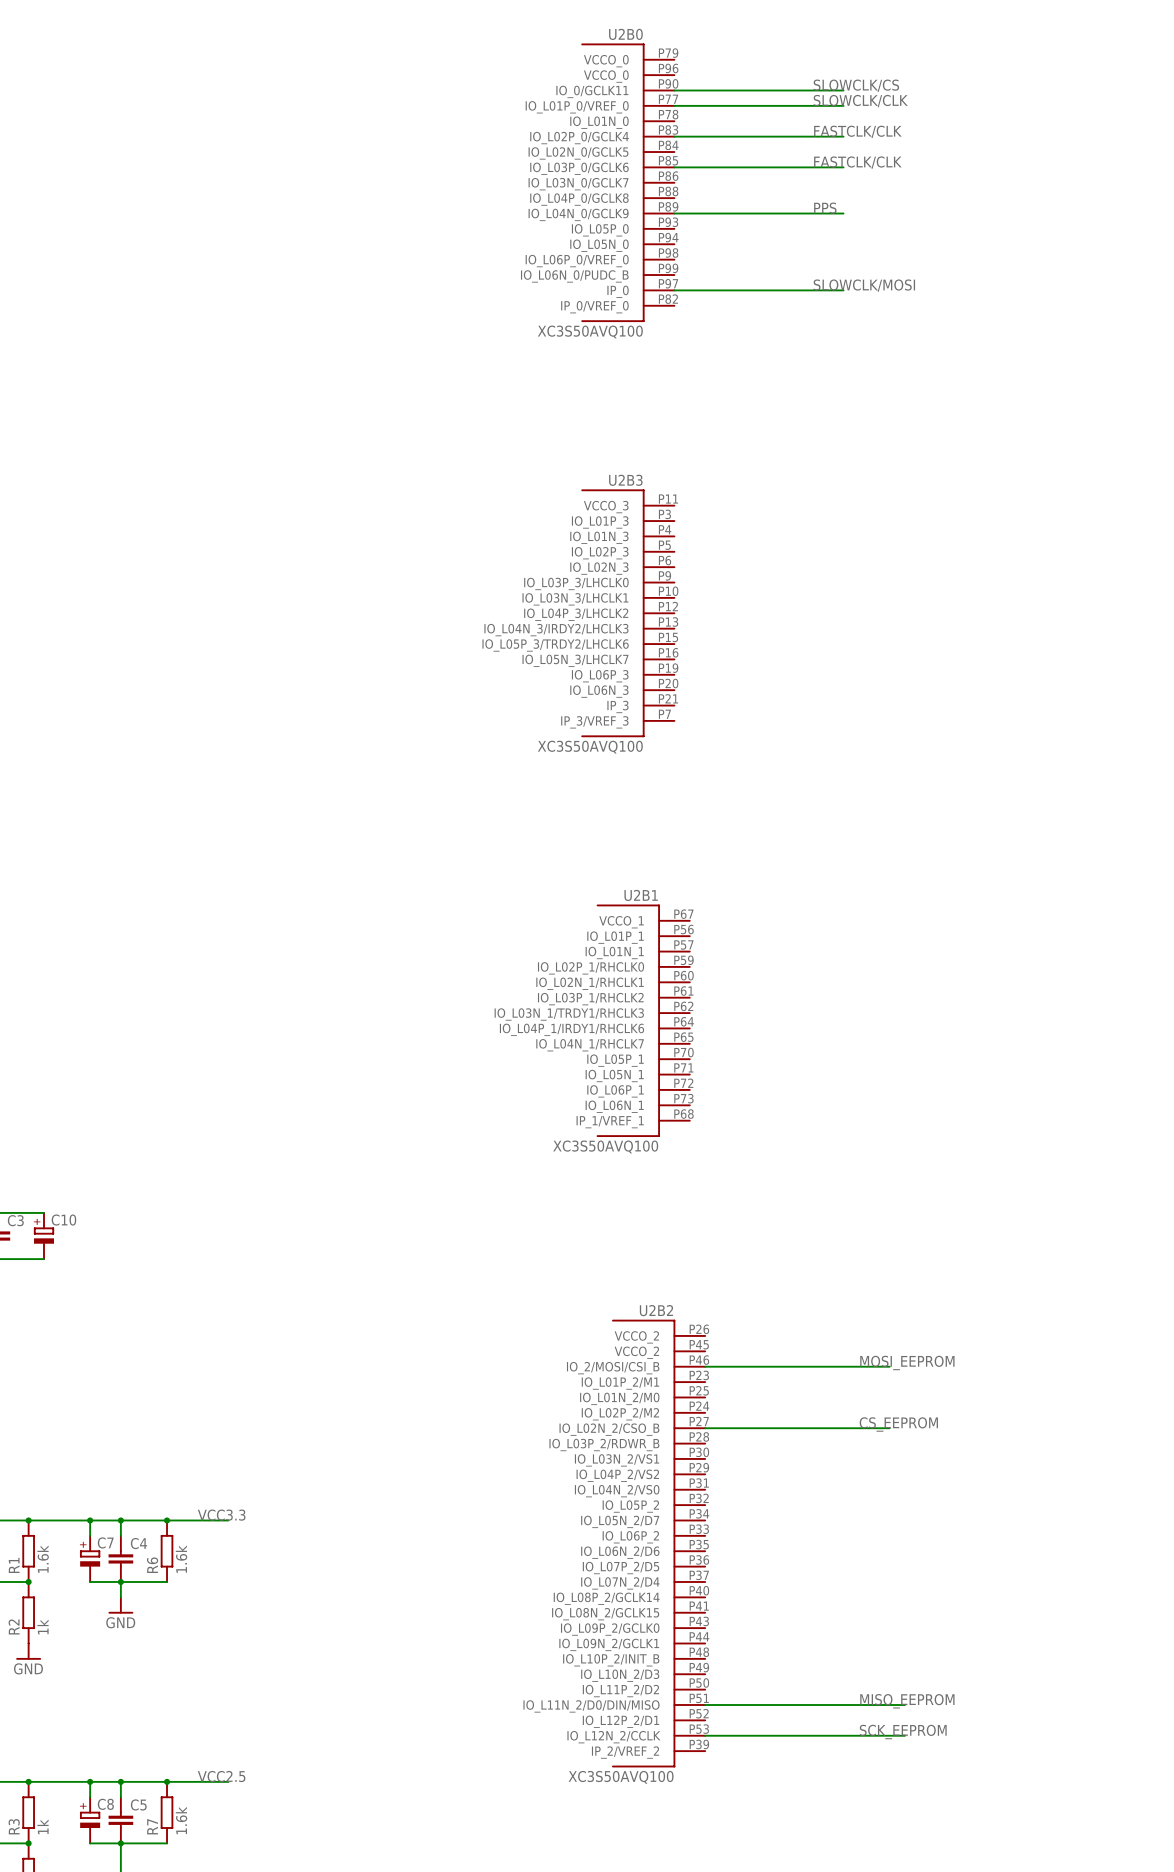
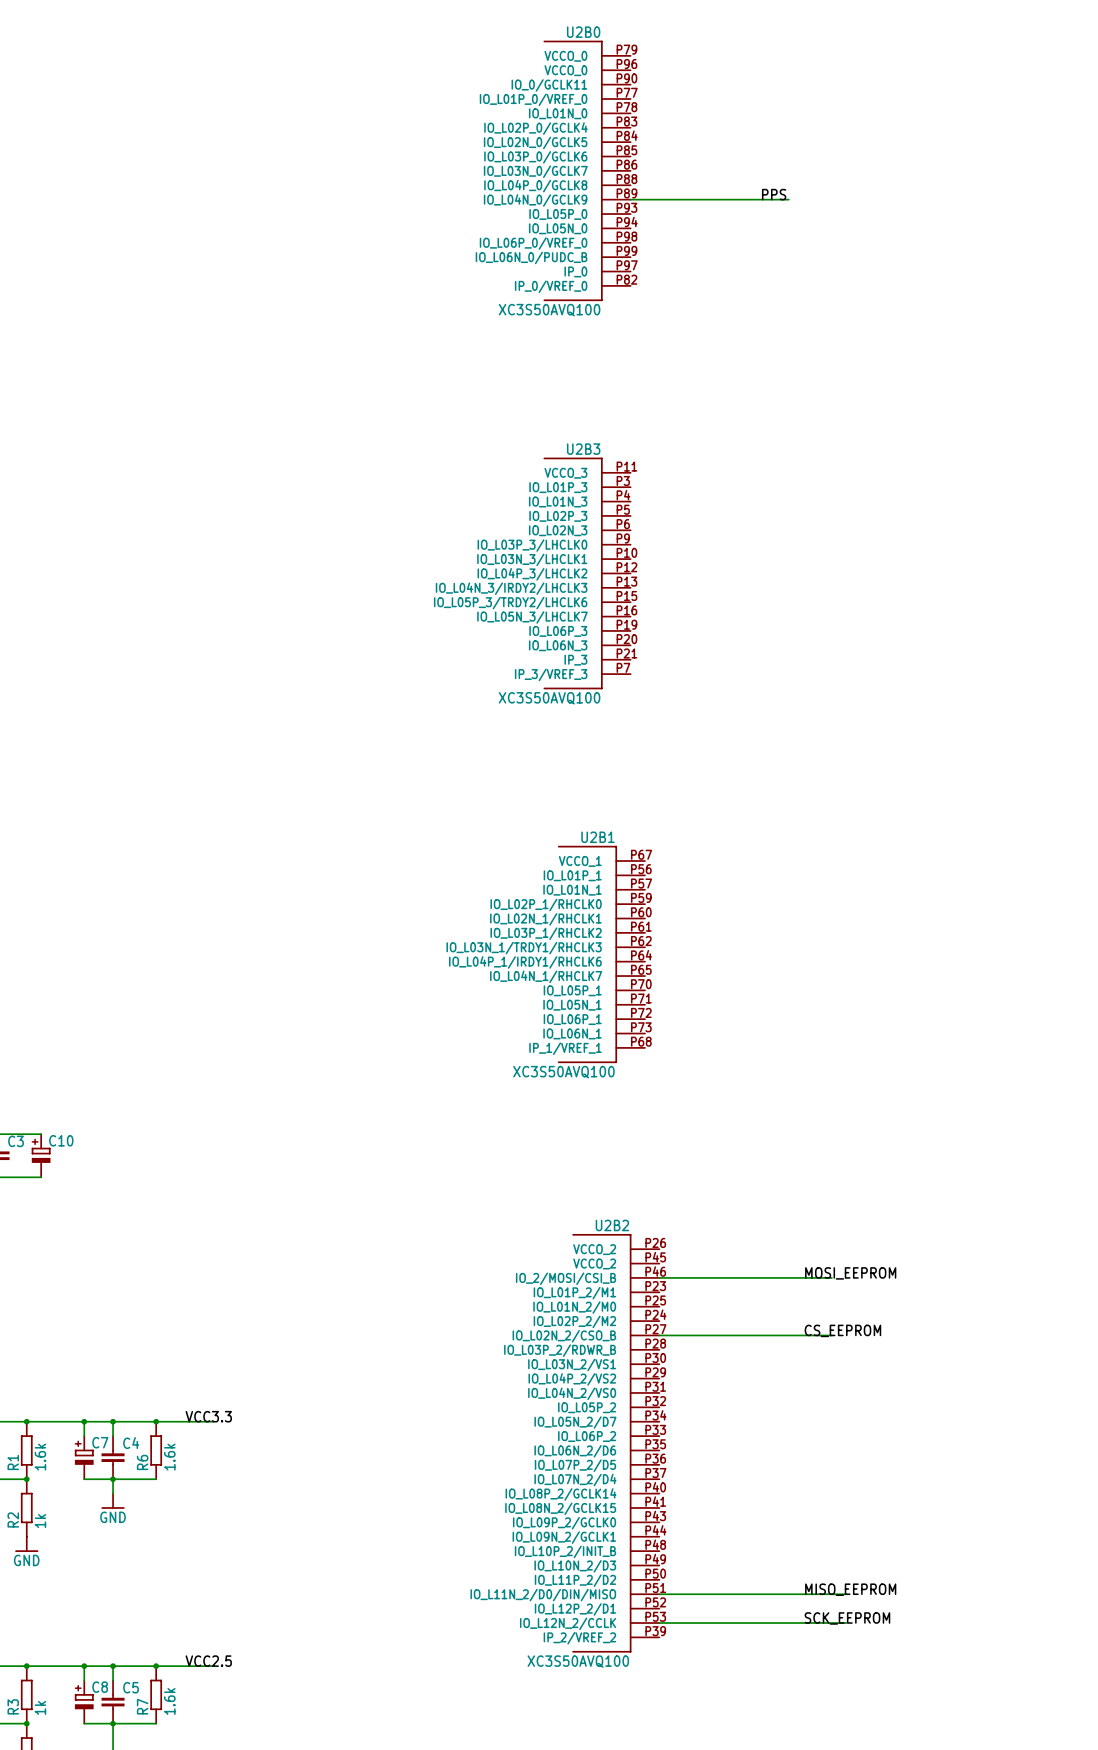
label: SLOWCLK/CS (856, 85) -> none
wire: (674, 90) (843, 90) -> none
label: SLOWCLK/CLK (860, 101) -> none
wire: (674, 105) (843, 105) -> none
label: FASTCLK/CLK (857, 131) -> none
wire: (674, 136) (843, 136) -> none
label: FASTCLK/CLK (857, 162) -> none
wire: (674, 167) (843, 167) -> none
label: SLOWCLK/MOSI (864, 285) -> none
wire: (674, 290) (843, 290) -> none

